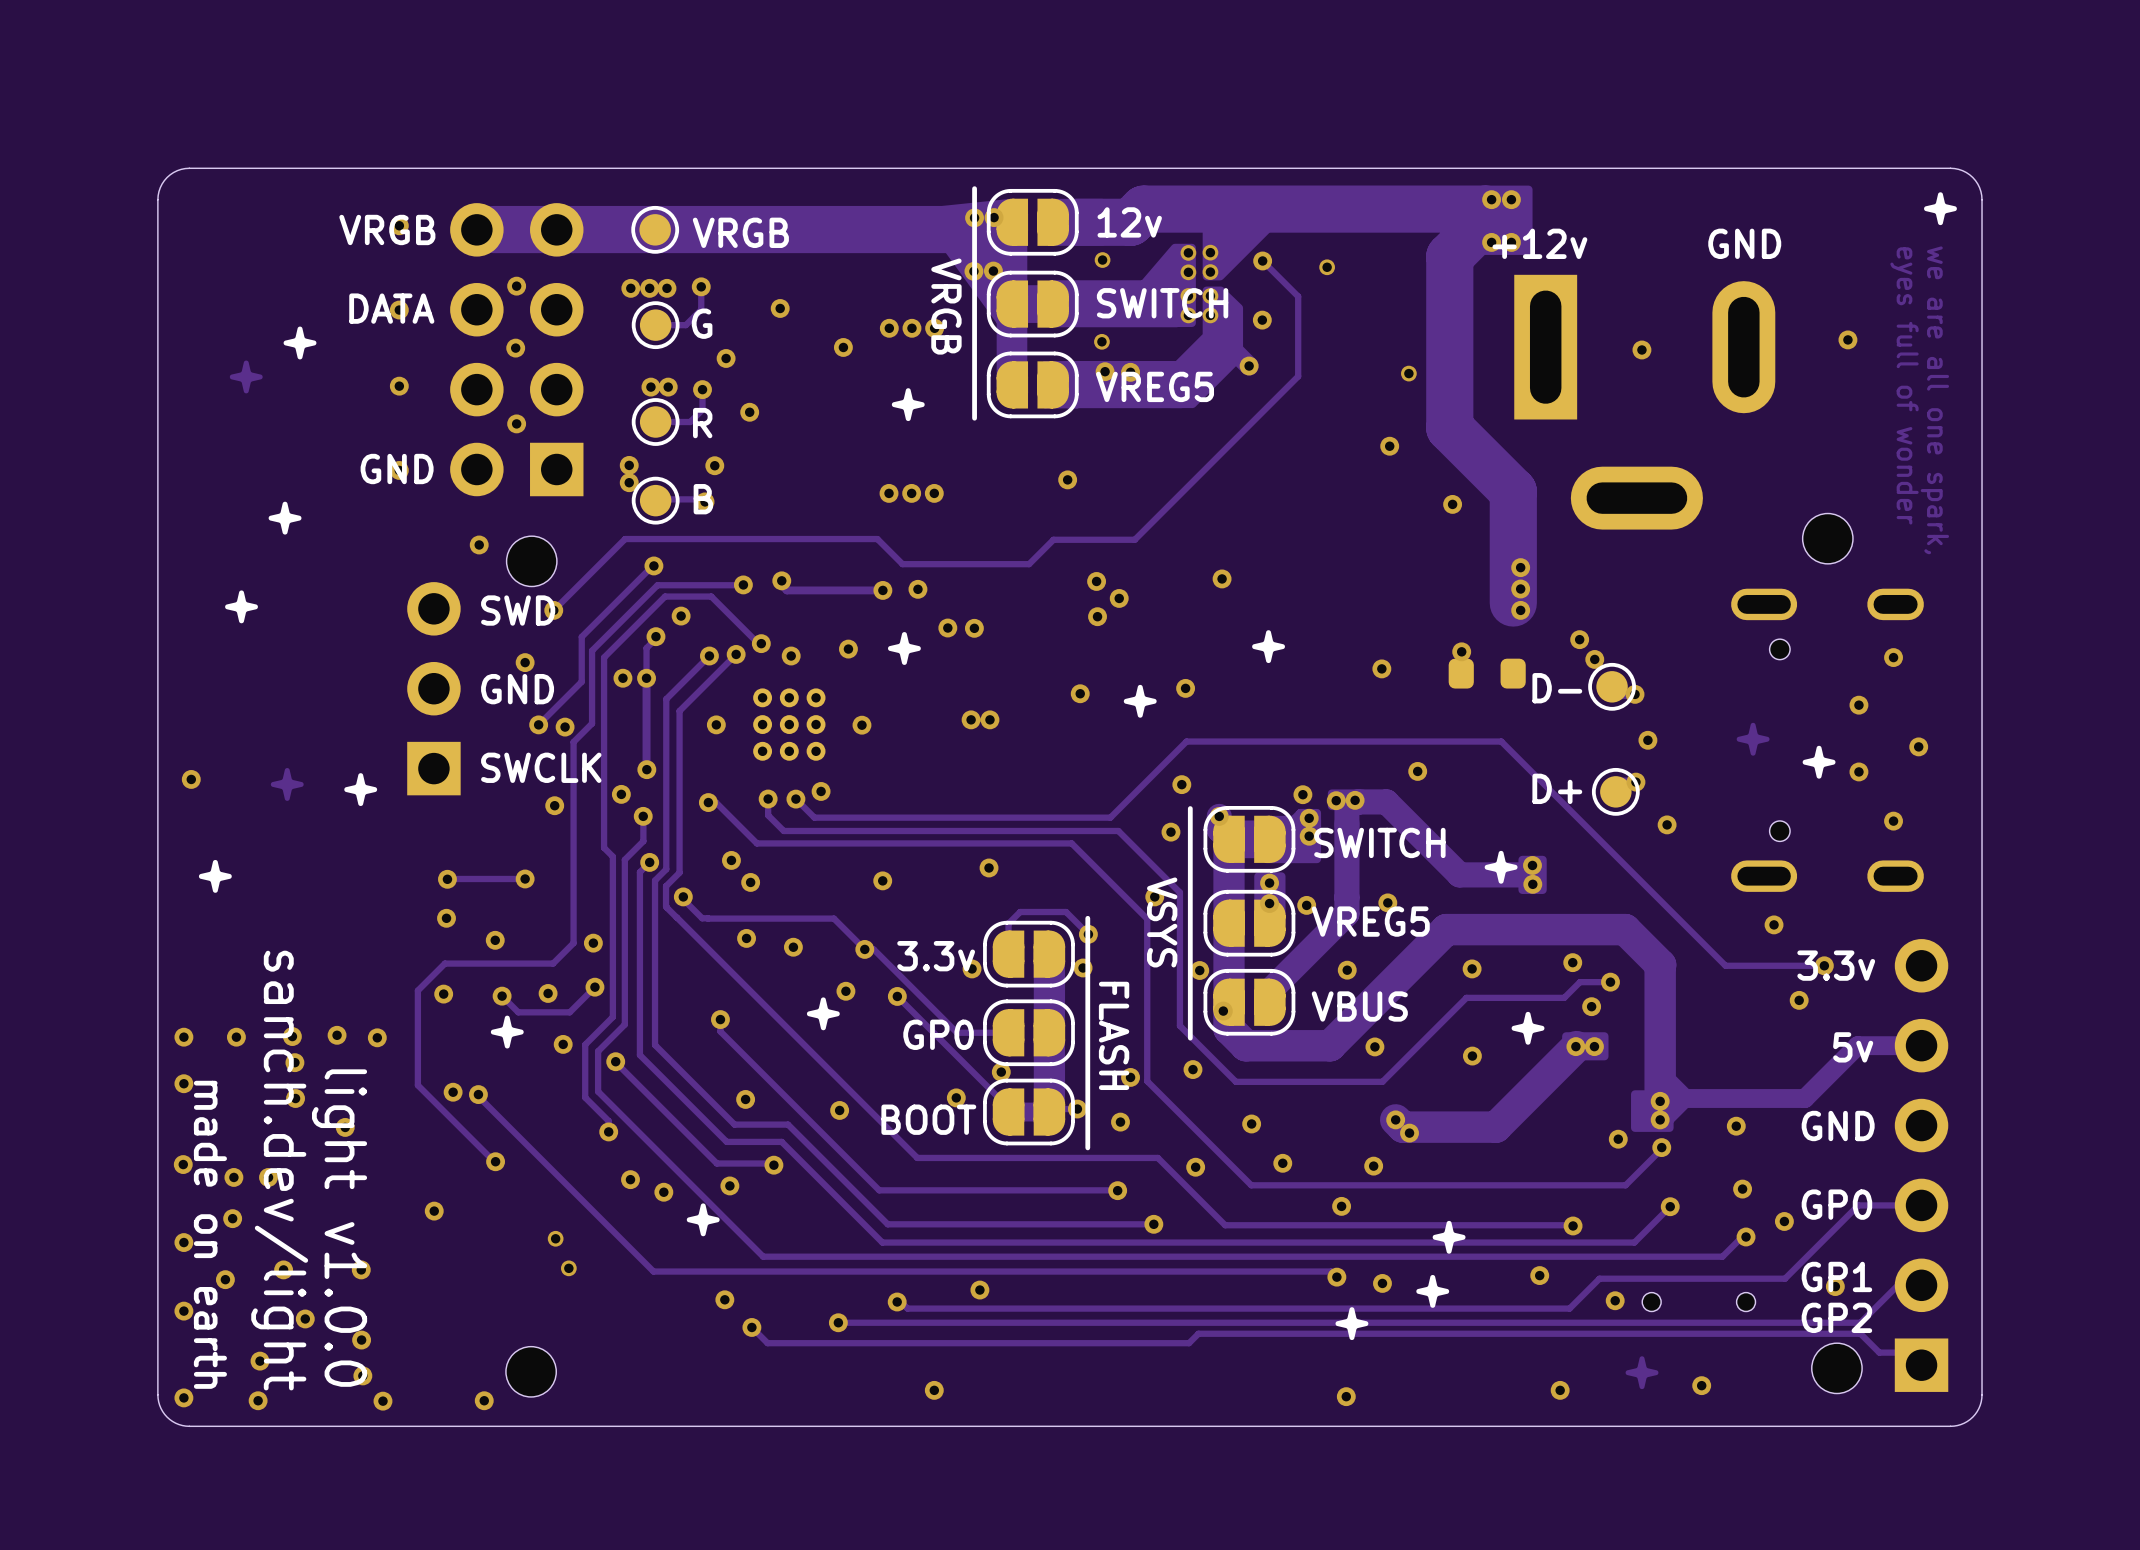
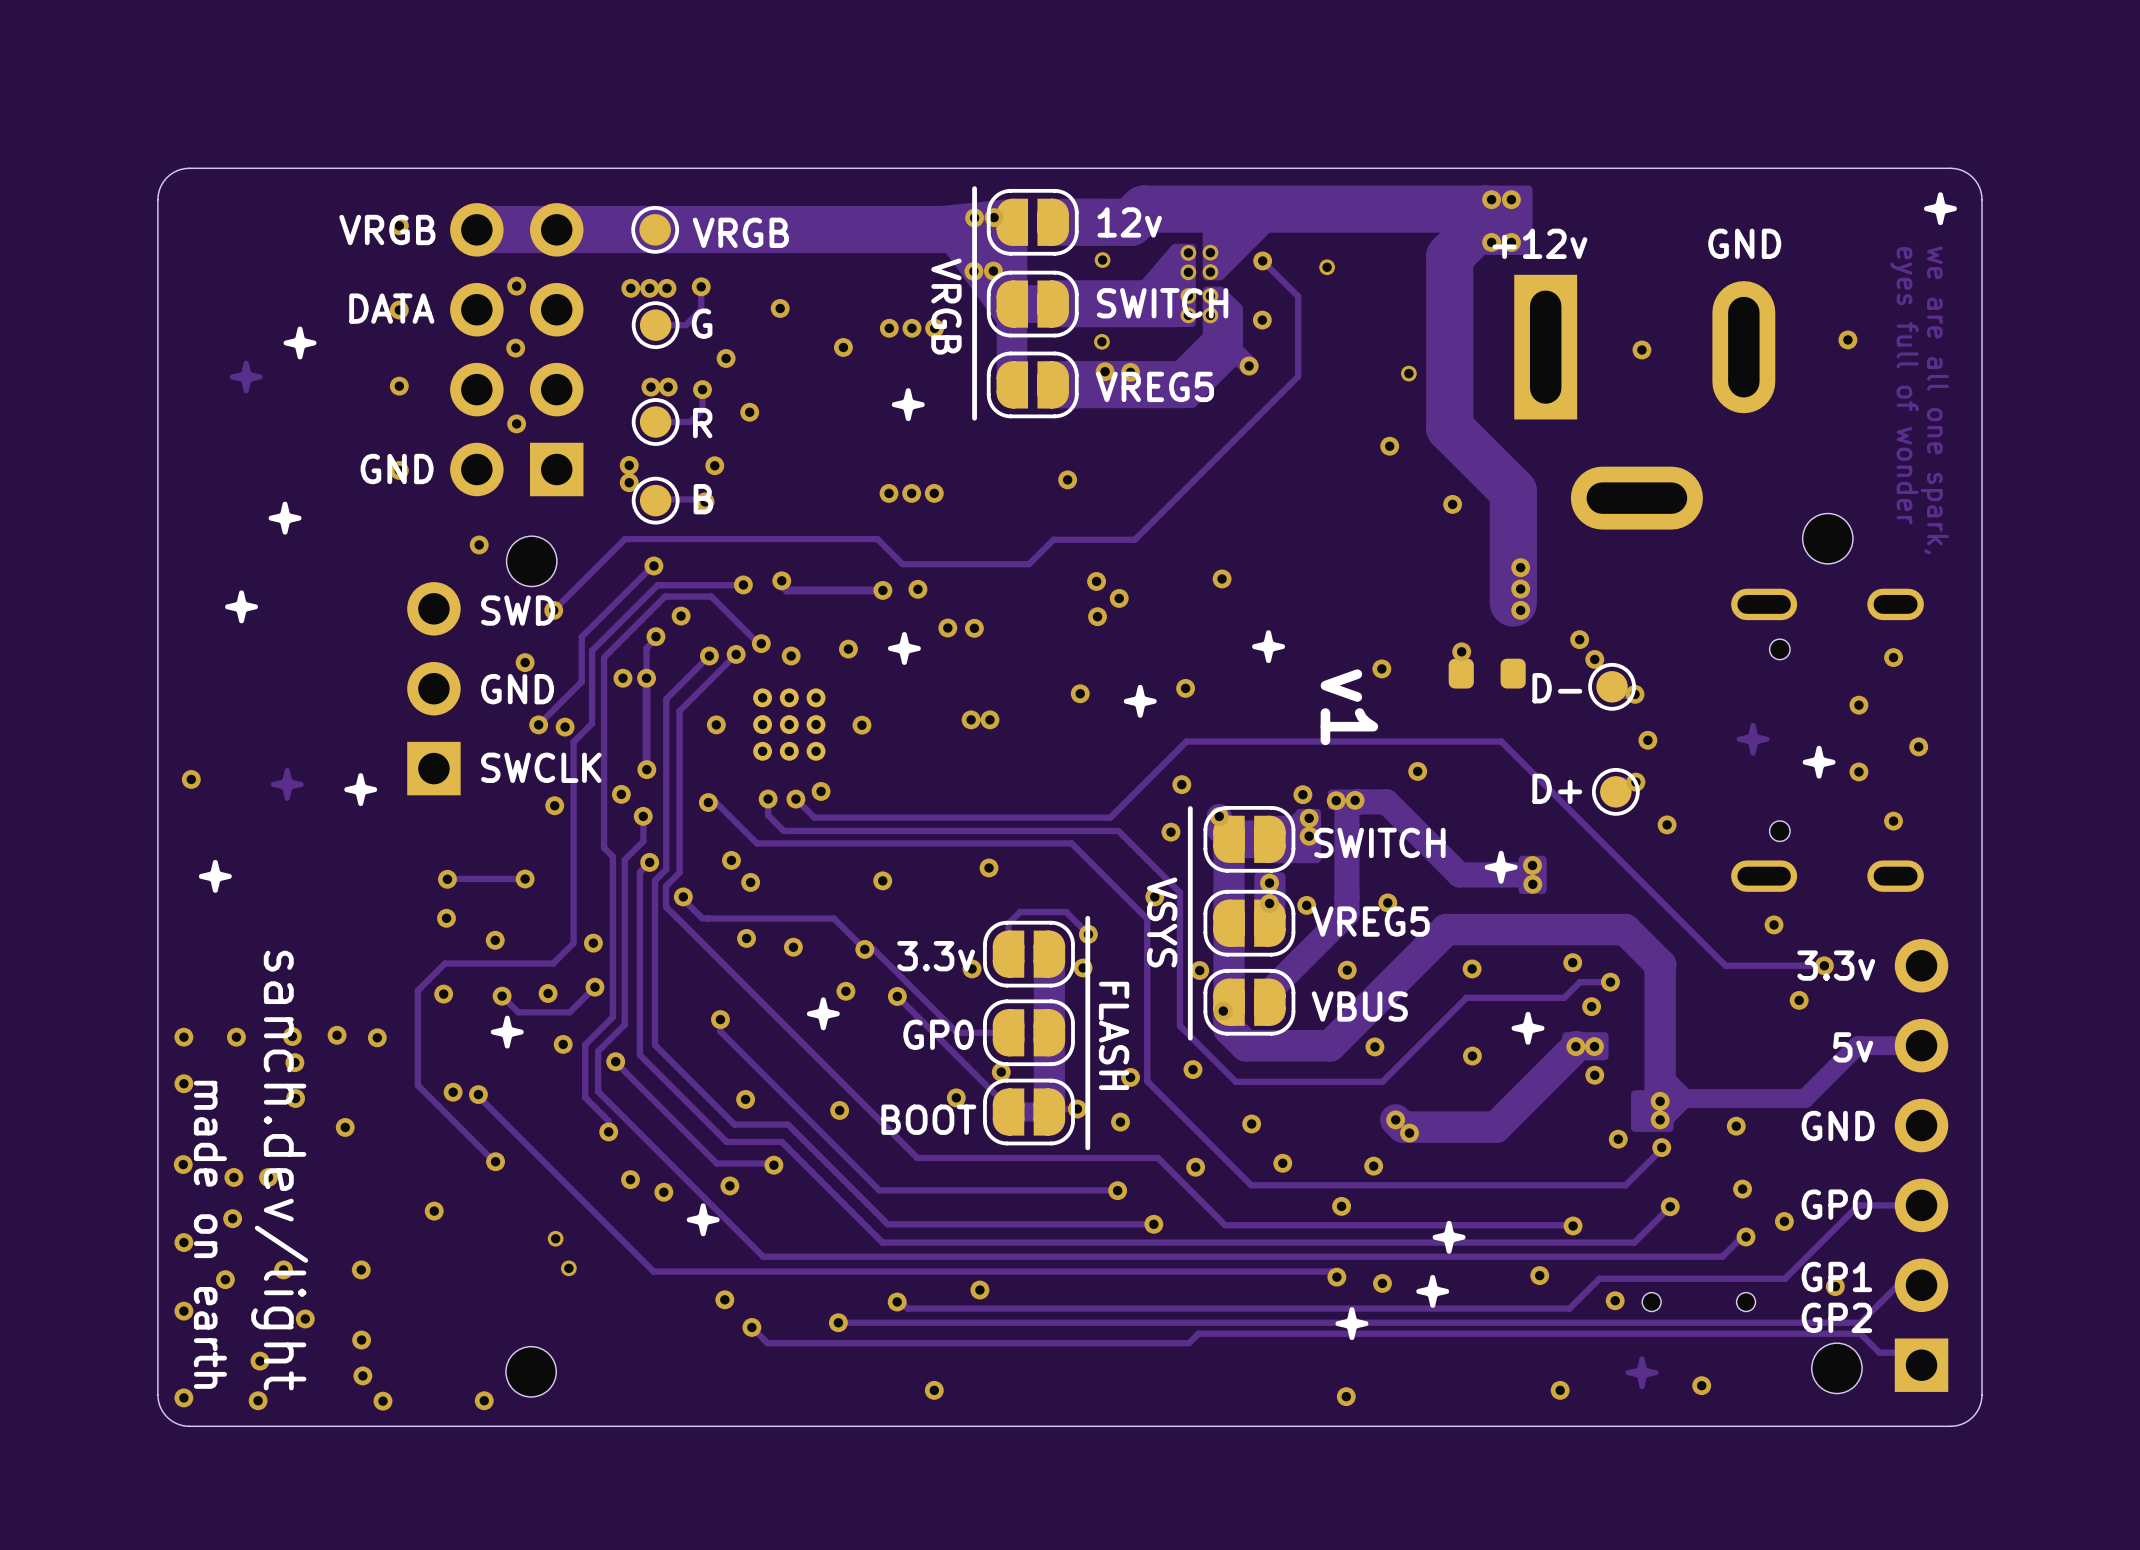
text: none -> v1 (1349, 707)
via: none -> (1594, 1075)
text: light v1.0.0 (339, 1228) -> none

